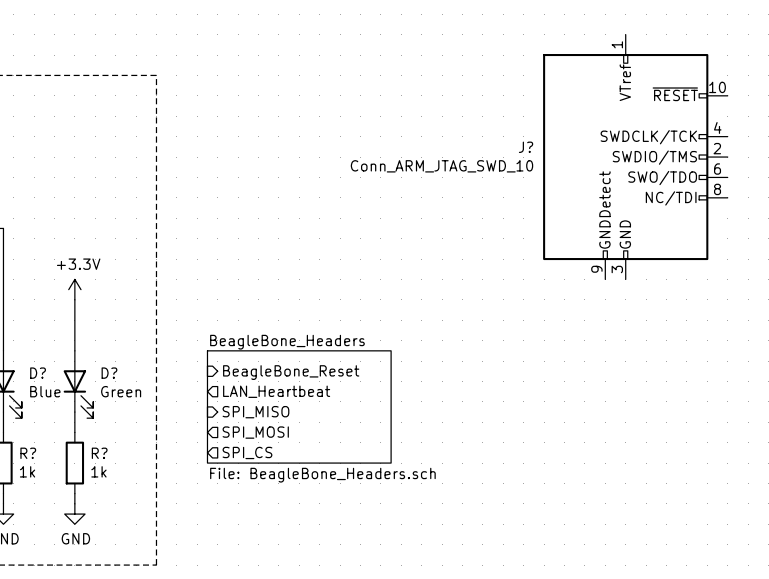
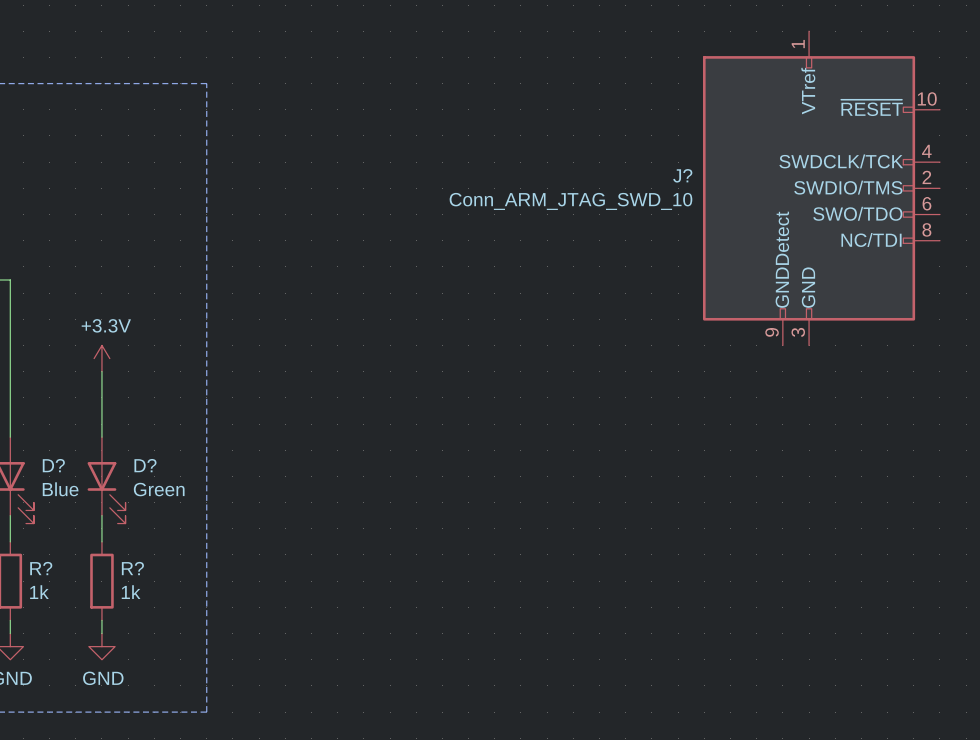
sheet pin: BeagleBone_Reset (291, 372) -> none
sheet pin: LAN_Heartbeat (276, 391) -> none
sheet BeagleBone_Headers: File: BeagleBone_Headers.sch (299, 406) -> none
sheet pin: SPI_MISO (255, 412) -> none
sheet pin: SPI_MOSI (255, 432) -> none
sheet pin: SPI_CS (247, 452) -> none

